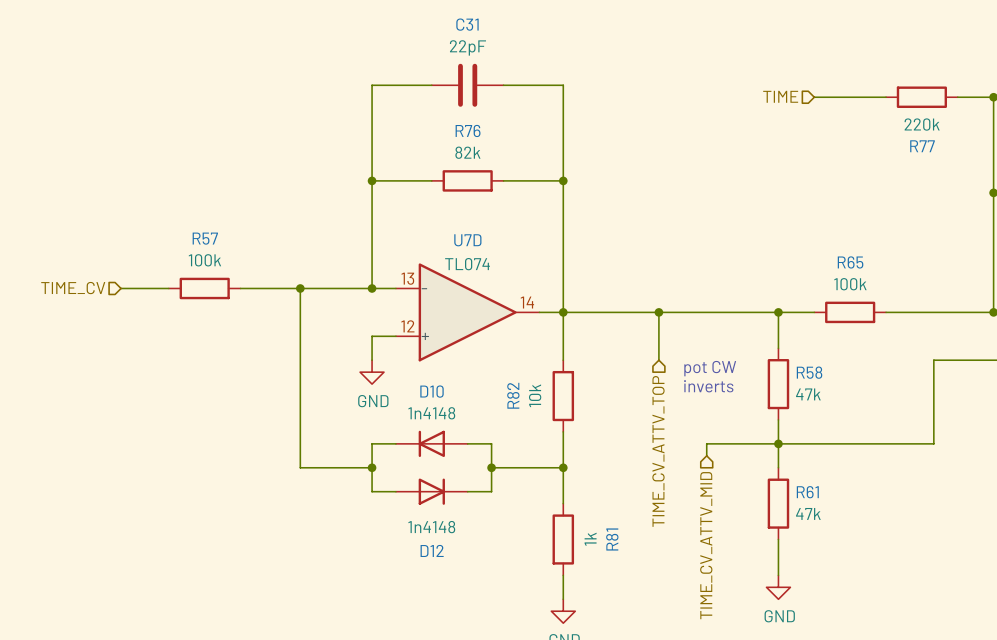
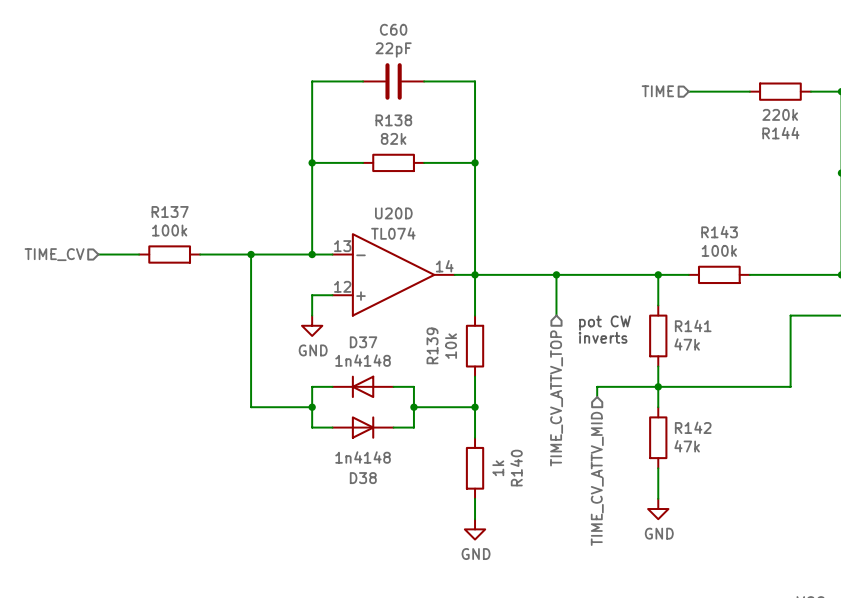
C31 name: C31 (467, 24) -> C60 (393, 29)
R76 name: R76 (468, 130) -> R138 (393, 120)
R77 name: R77 (922, 146) -> R144 (780, 133)
R57 name: R57 (205, 238) -> R137 (170, 211)
U7D name: U7D (467, 240) -> U20D (393, 213)
R65 name: R65 (850, 262) -> R143 (719, 232)
R58 name: R58 (809, 372) -> R141 (693, 325)
D10 name: D10 (432, 391) -> D37 (363, 342)
R82 name: R82 (513, 395) -> R139 (432, 345)
R61 name: R61 (807, 492) -> R142 (693, 427)
R81 name: R81 (612, 539) -> R140 (516, 468)
D12 name: D12 (432, 550) -> D38 (363, 478)

